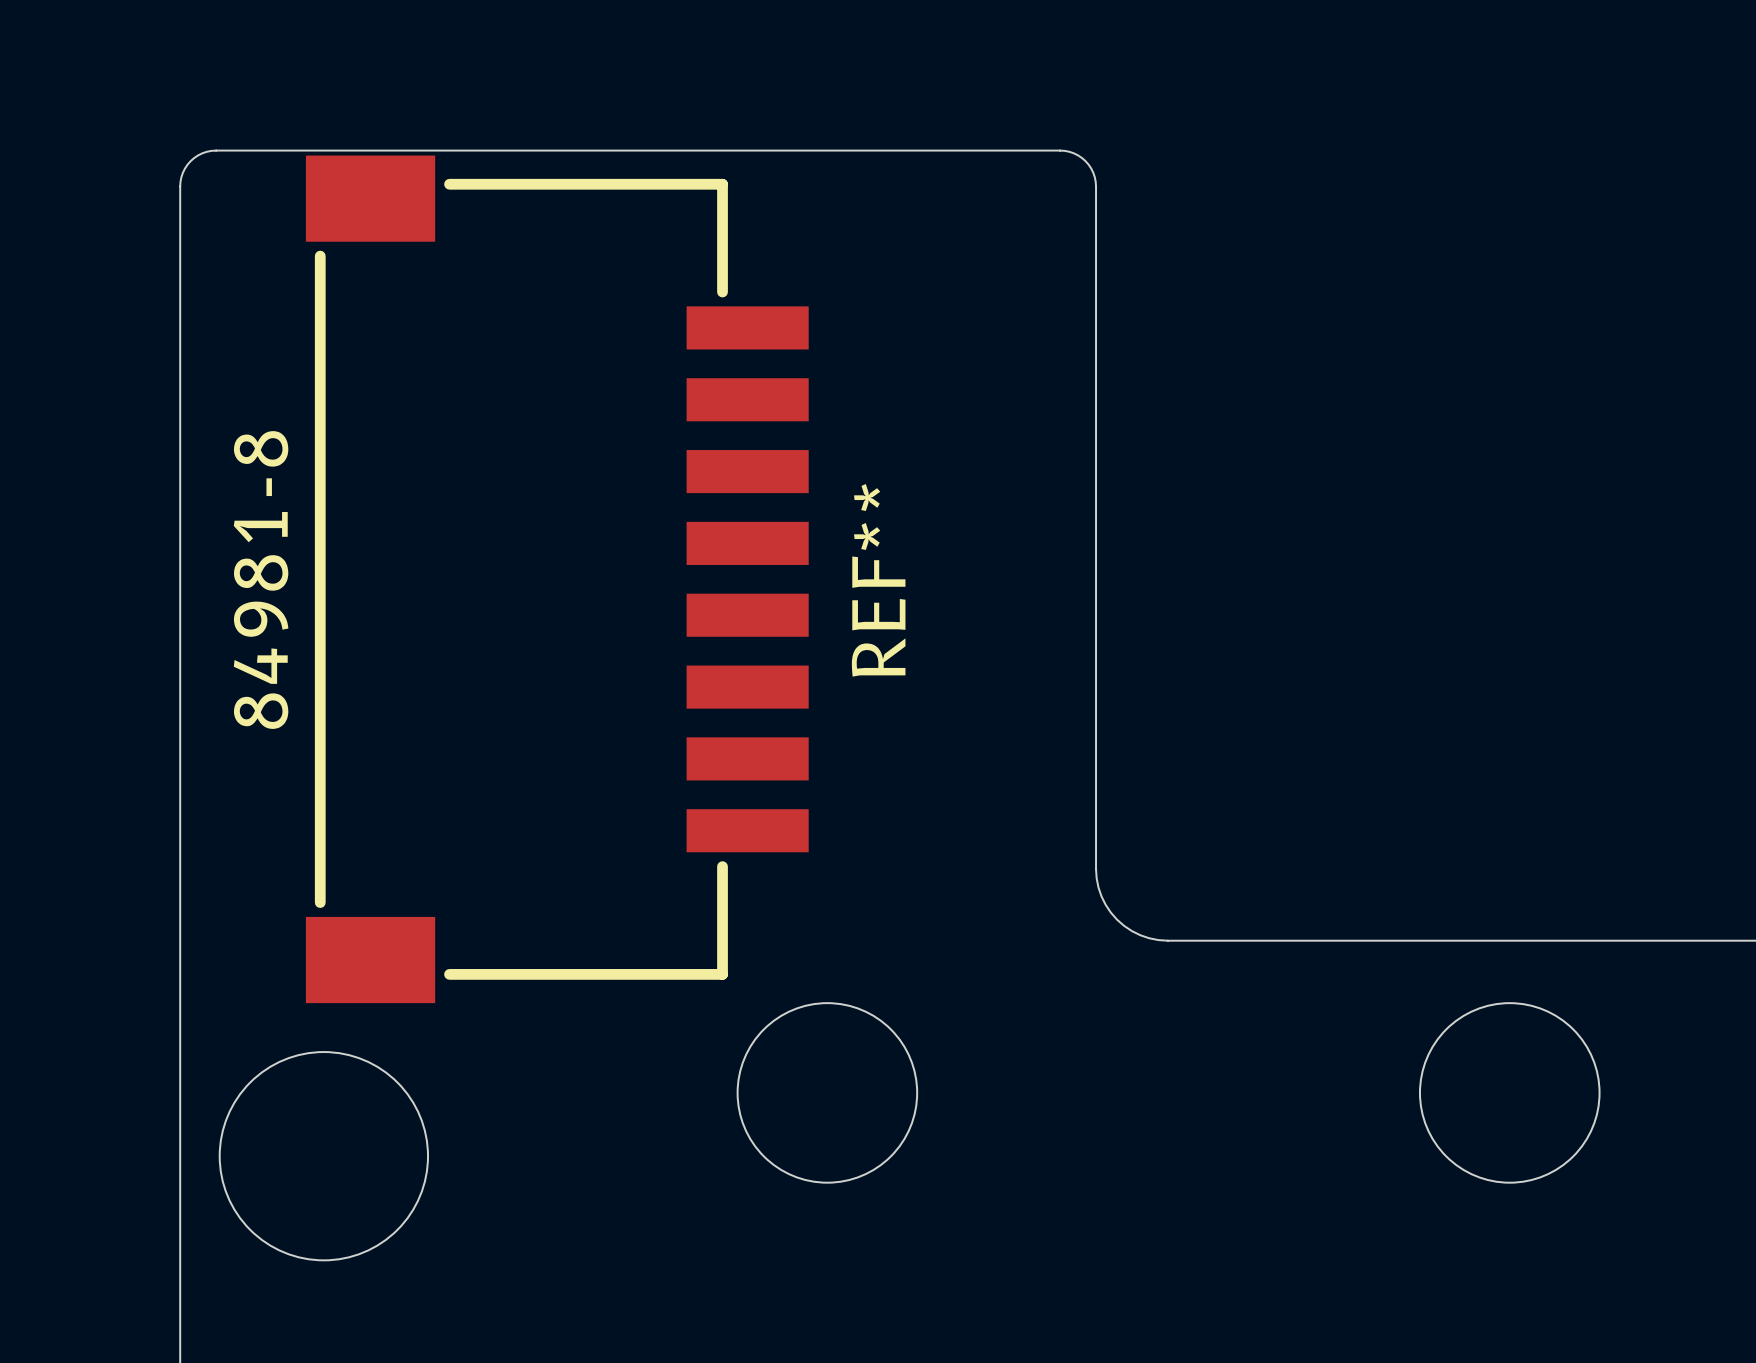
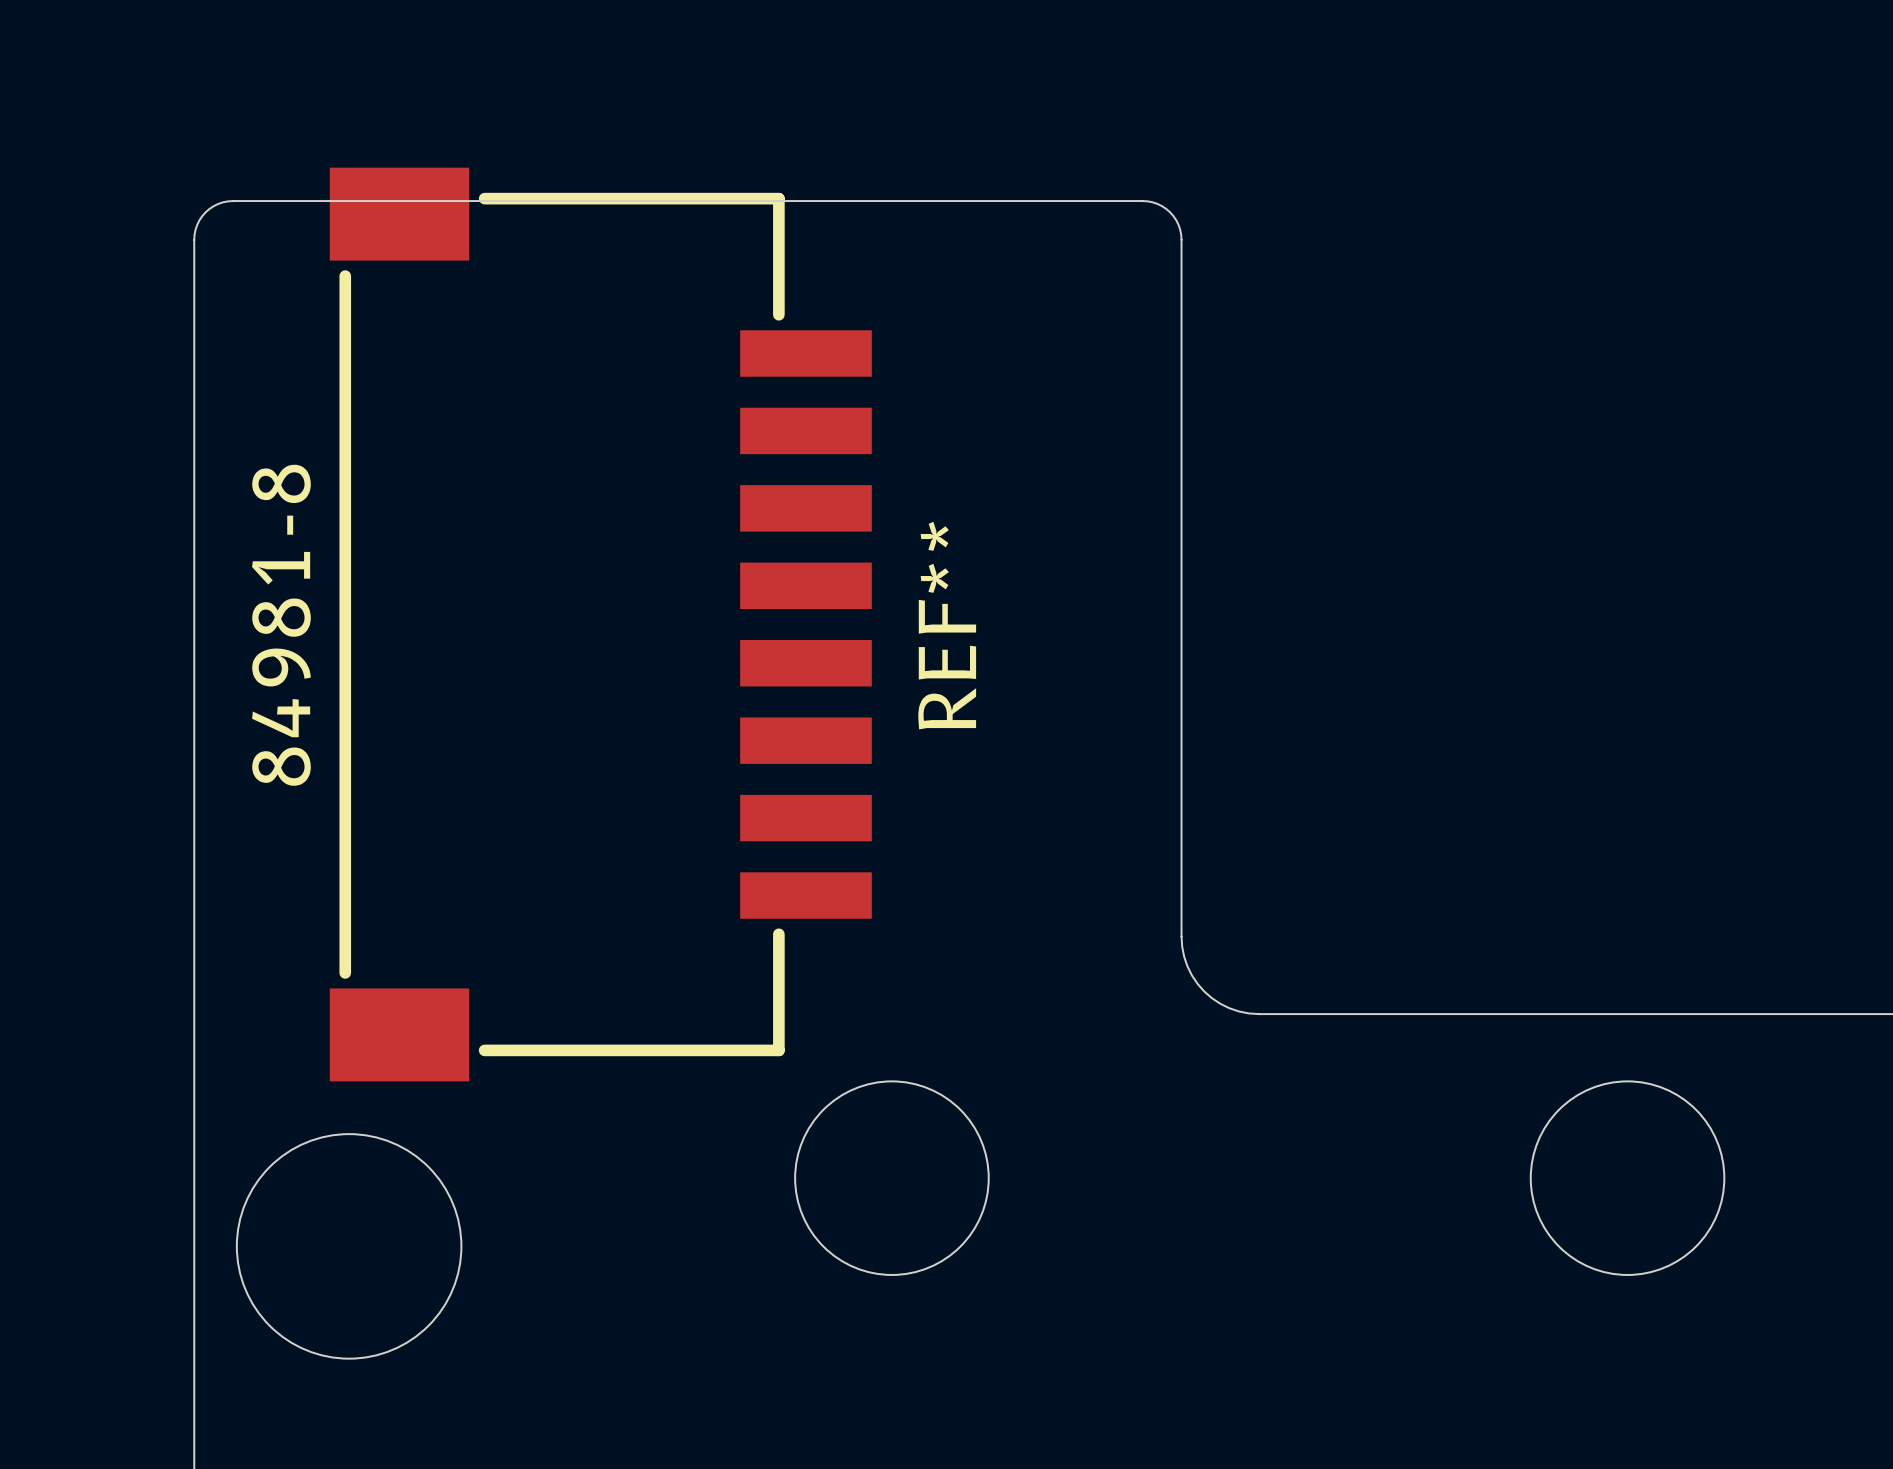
board edge: (180, 222) (180, 181) (185, 168) (198, 155) (216, 150) (1064, 150) (1081, 157) (1093, 172) (1096, 186) (1096, 222) -> (194, 239) (197, 224) (205, 212) (218, 203) (232, 201) (1142, 201) (1157, 203) (1170, 212) (1178, 224) (1181, 239)

